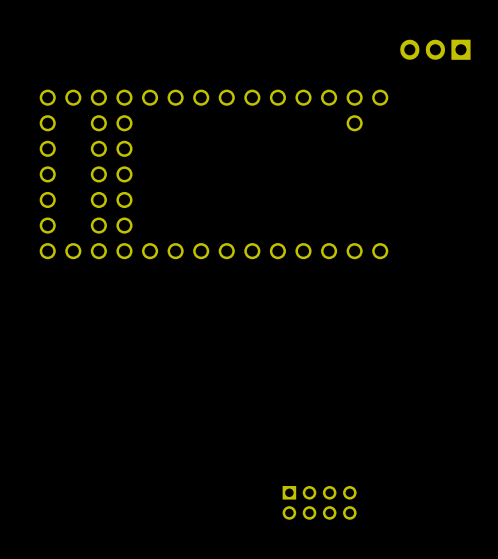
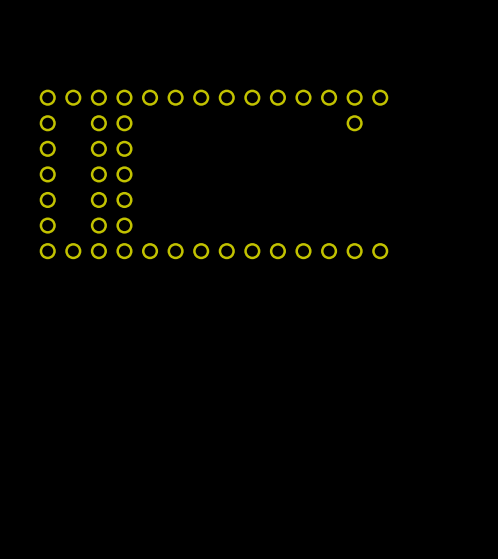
part: (435, 49) -> none
part: (319, 502) -> none

